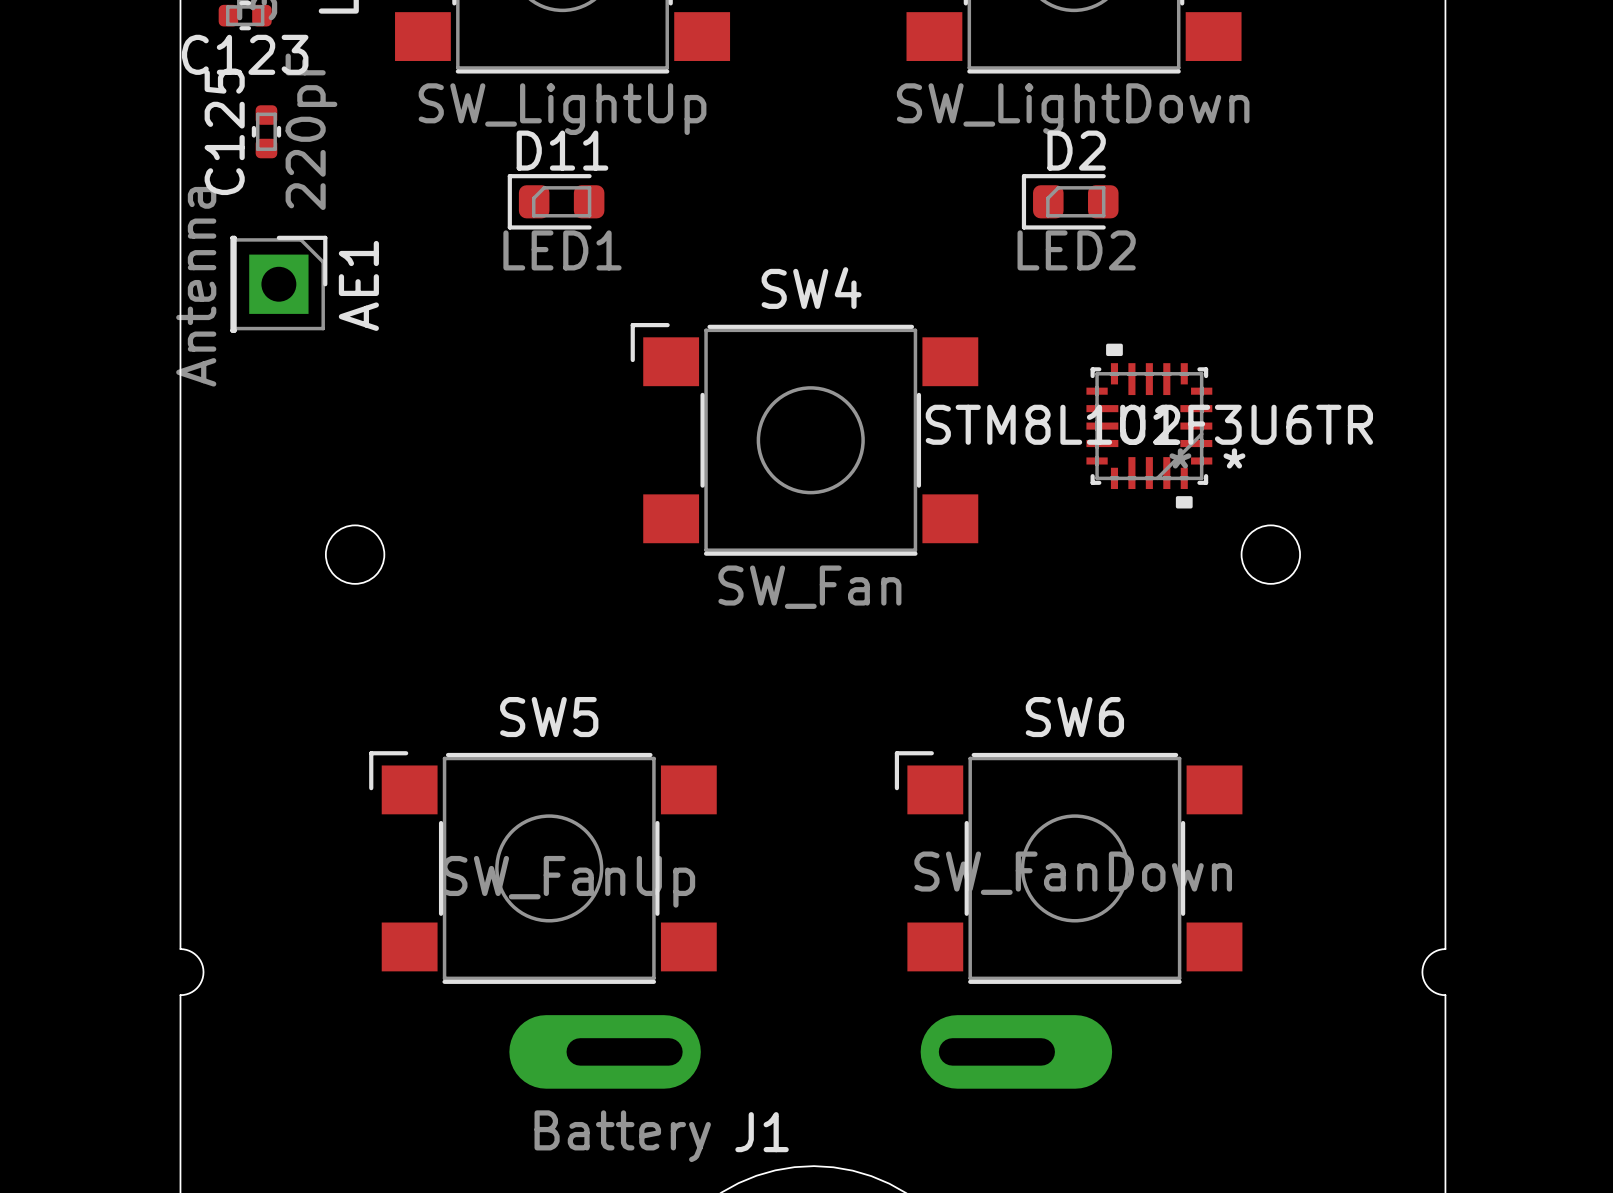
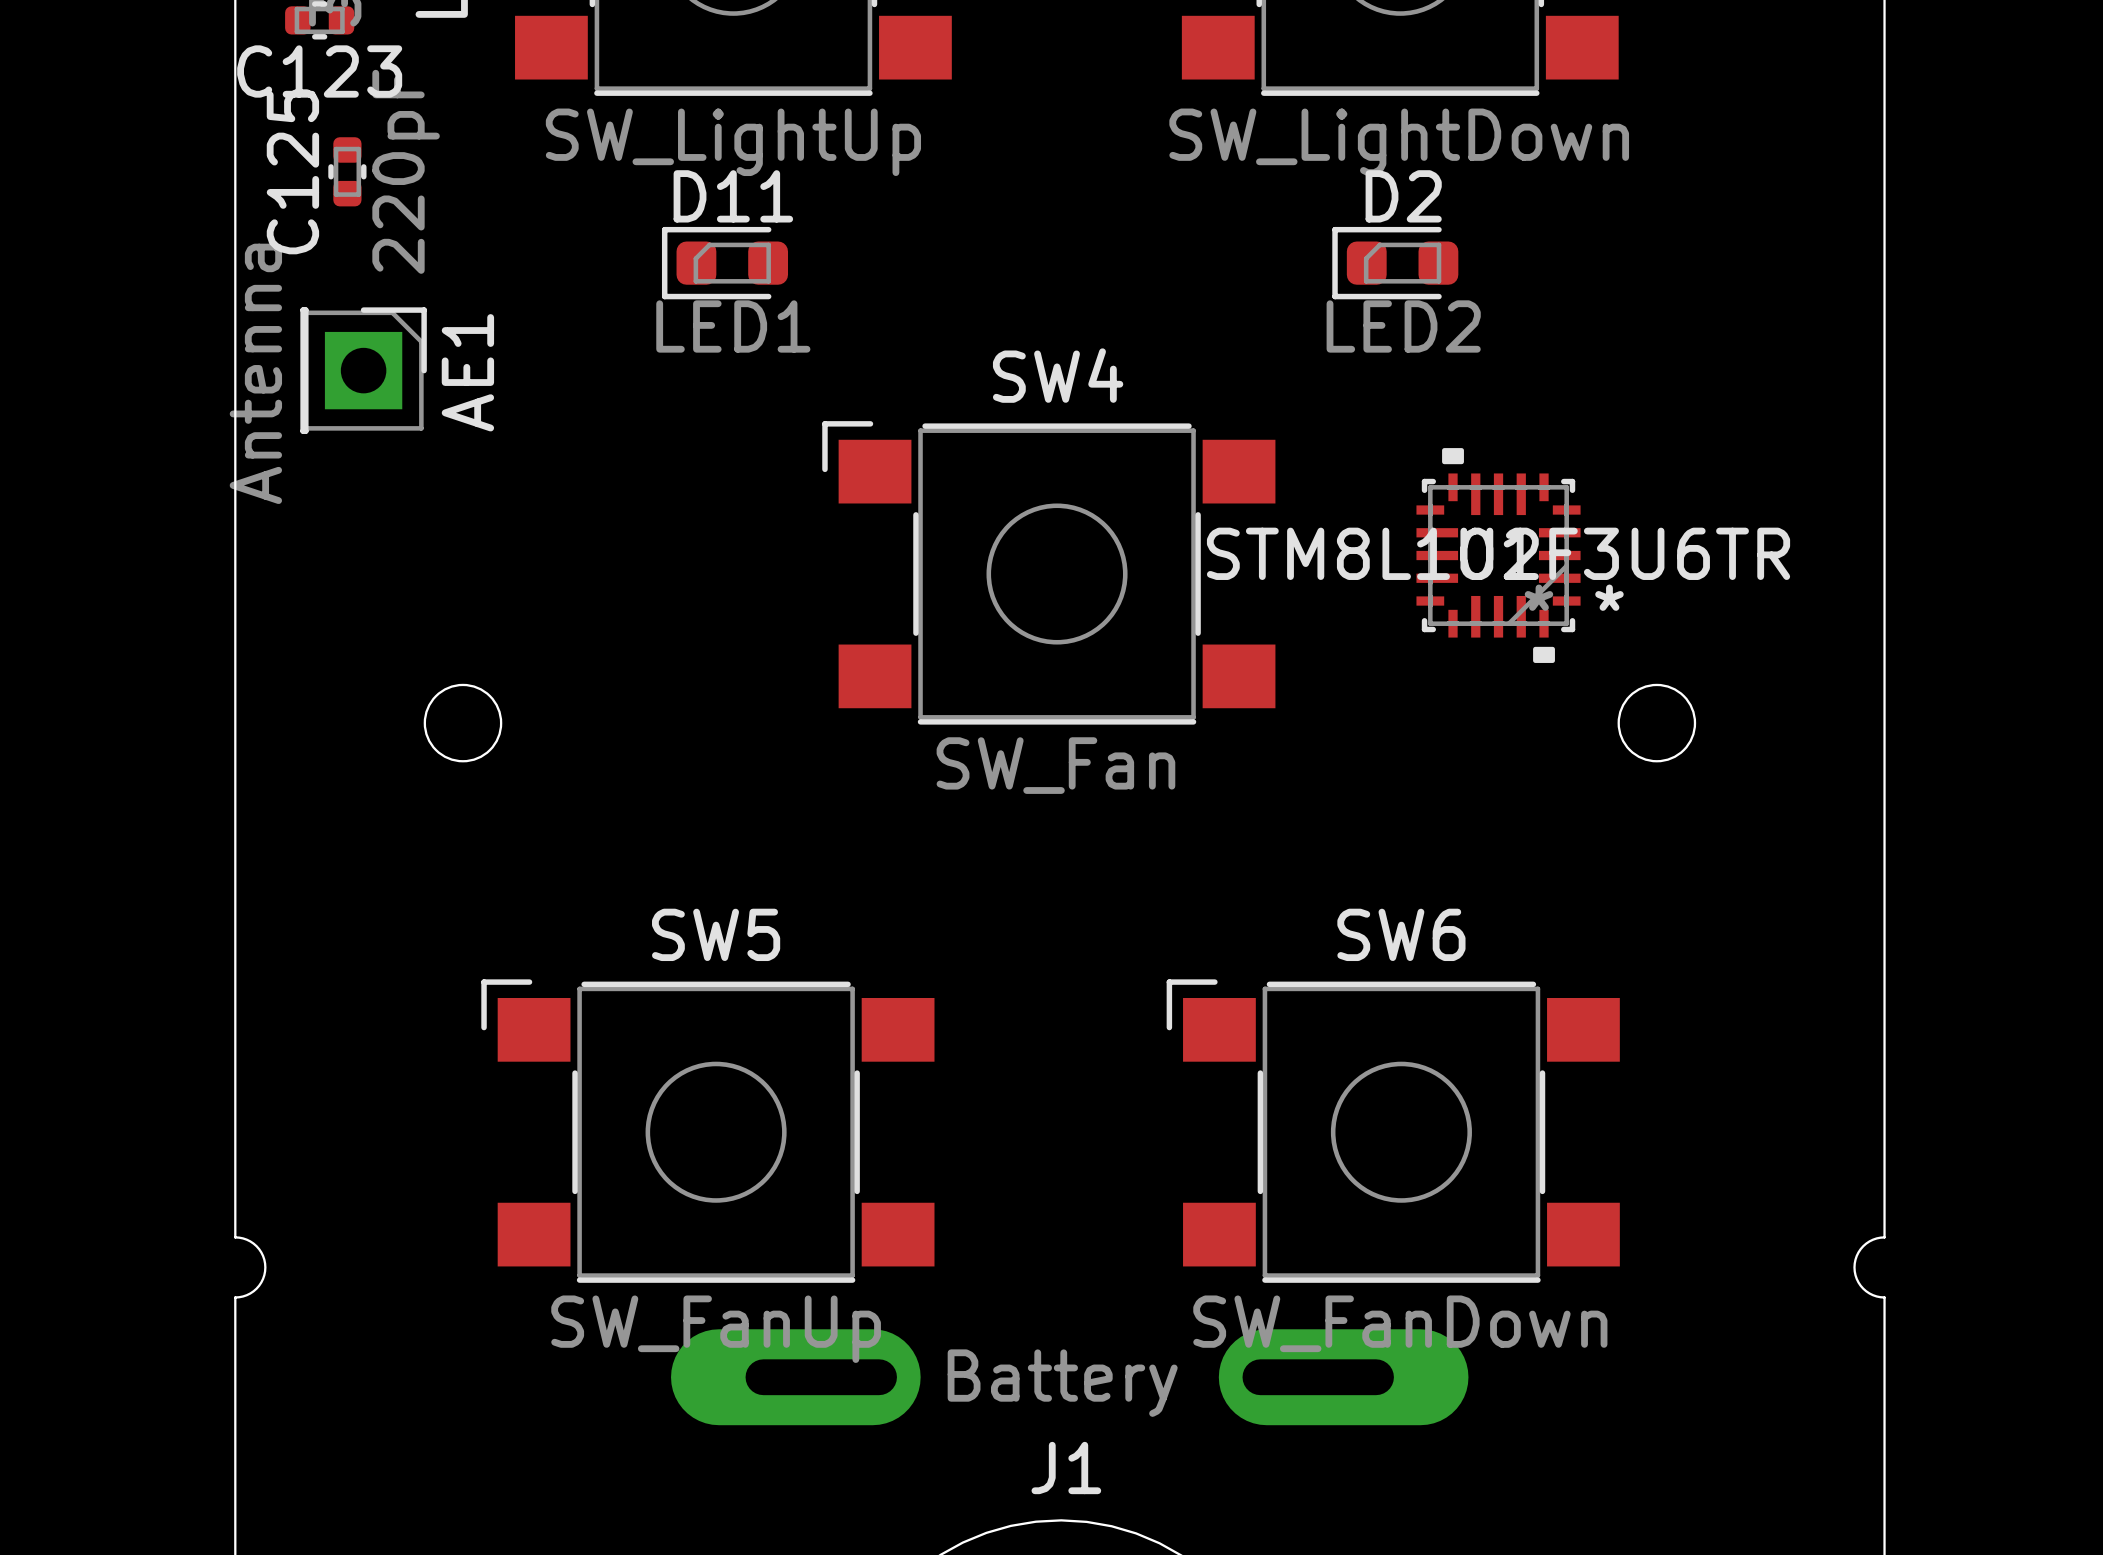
SW6 value position: SW_FanDown (1073, 873) -> SW_FanDown (1400, 1323)
SW5 value position: SW_FanUp (568, 881) -> SW_FanUp (716, 1329)
J1 footprint: [509, 1015, 1113, 1089] -> [671, 1329, 1469, 1426]
J1 name position: J1 (762, 1132) -> J1 (1066, 1467)
J1 value position: Battery (622, 1136) -> Battery (1062, 1383)

